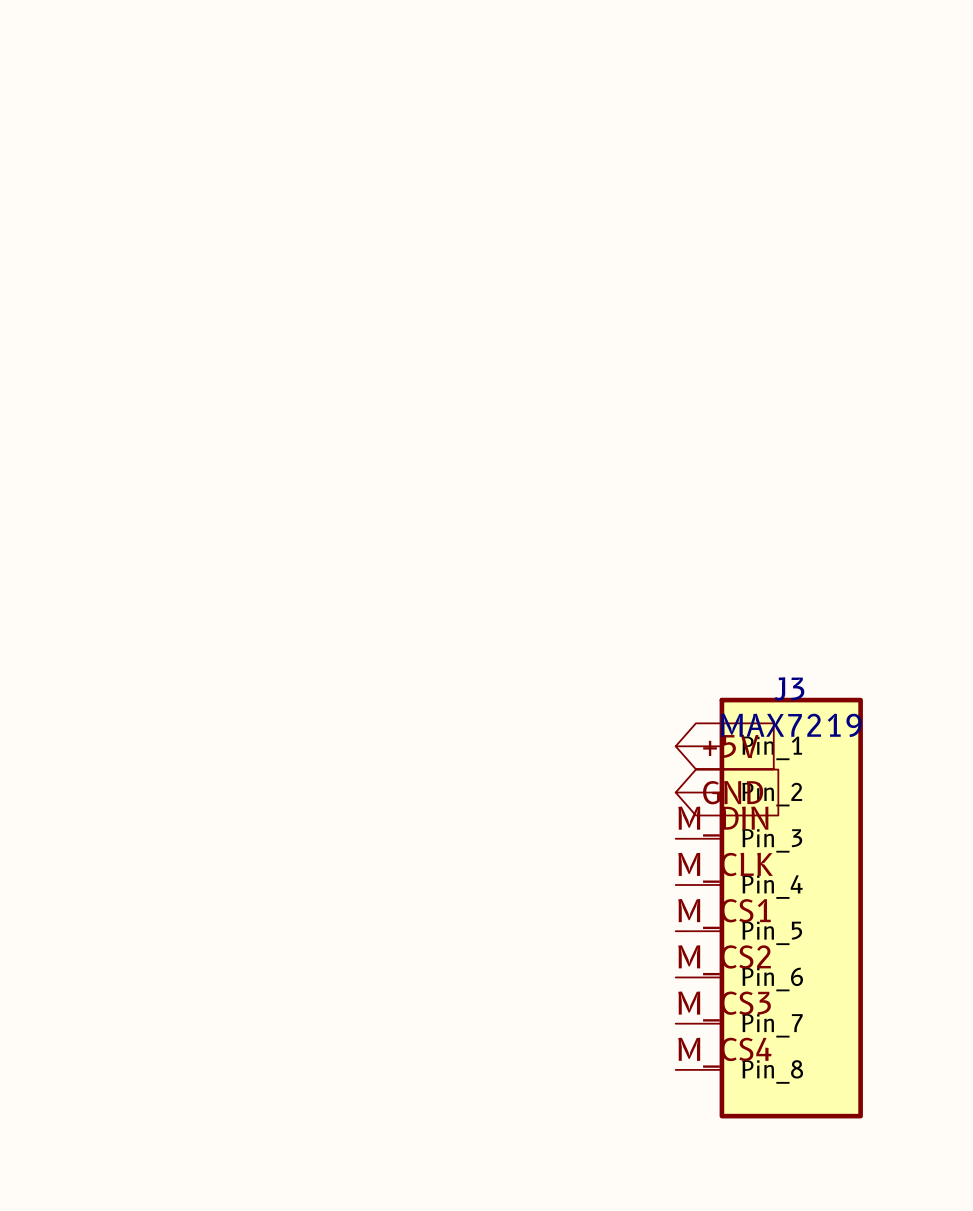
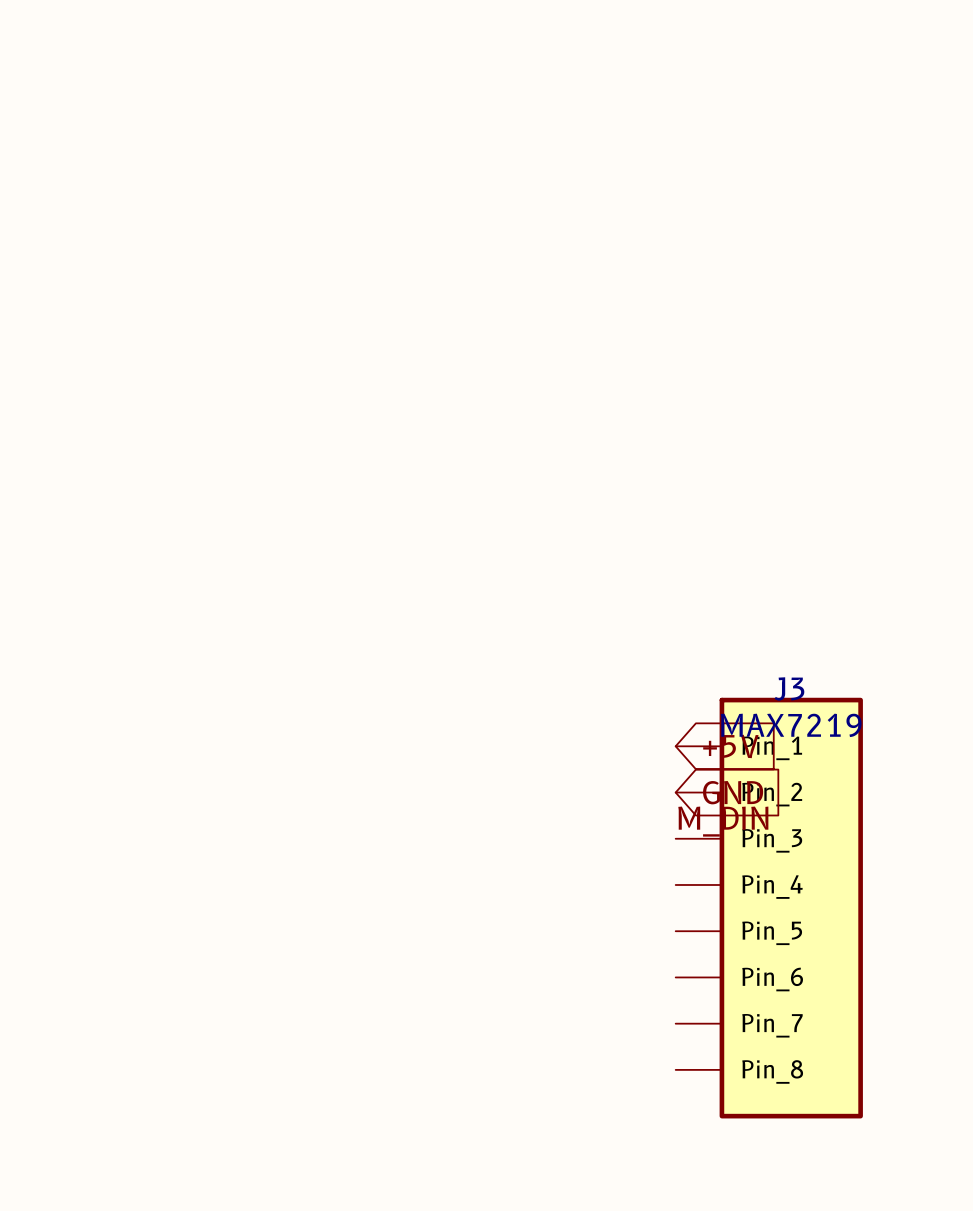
label: M_CLK (725, 867) -> none
label: M_CS1 (724, 914) -> none
label: M_CS2 (724, 960) -> none
label: M_CS3 (724, 1006) -> none
label: M_CS4 (724, 1052) -> none

